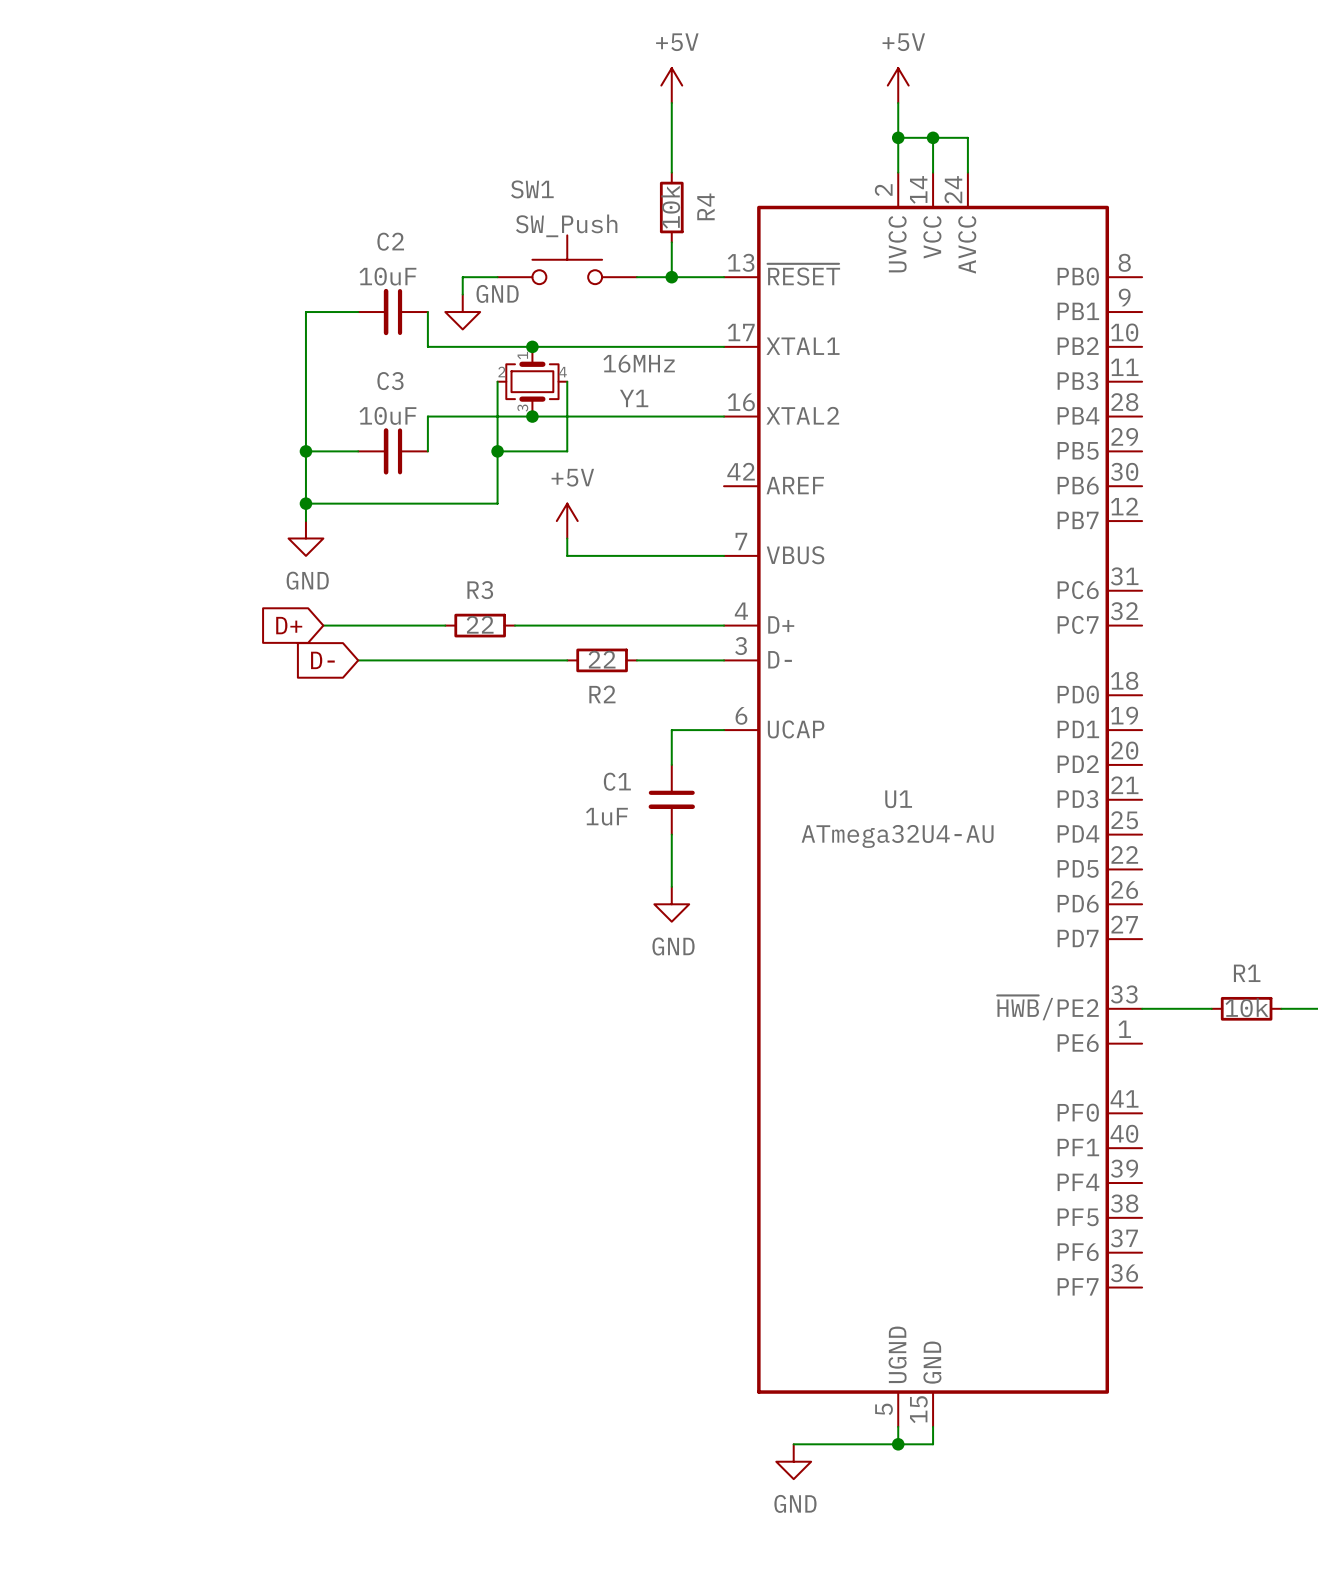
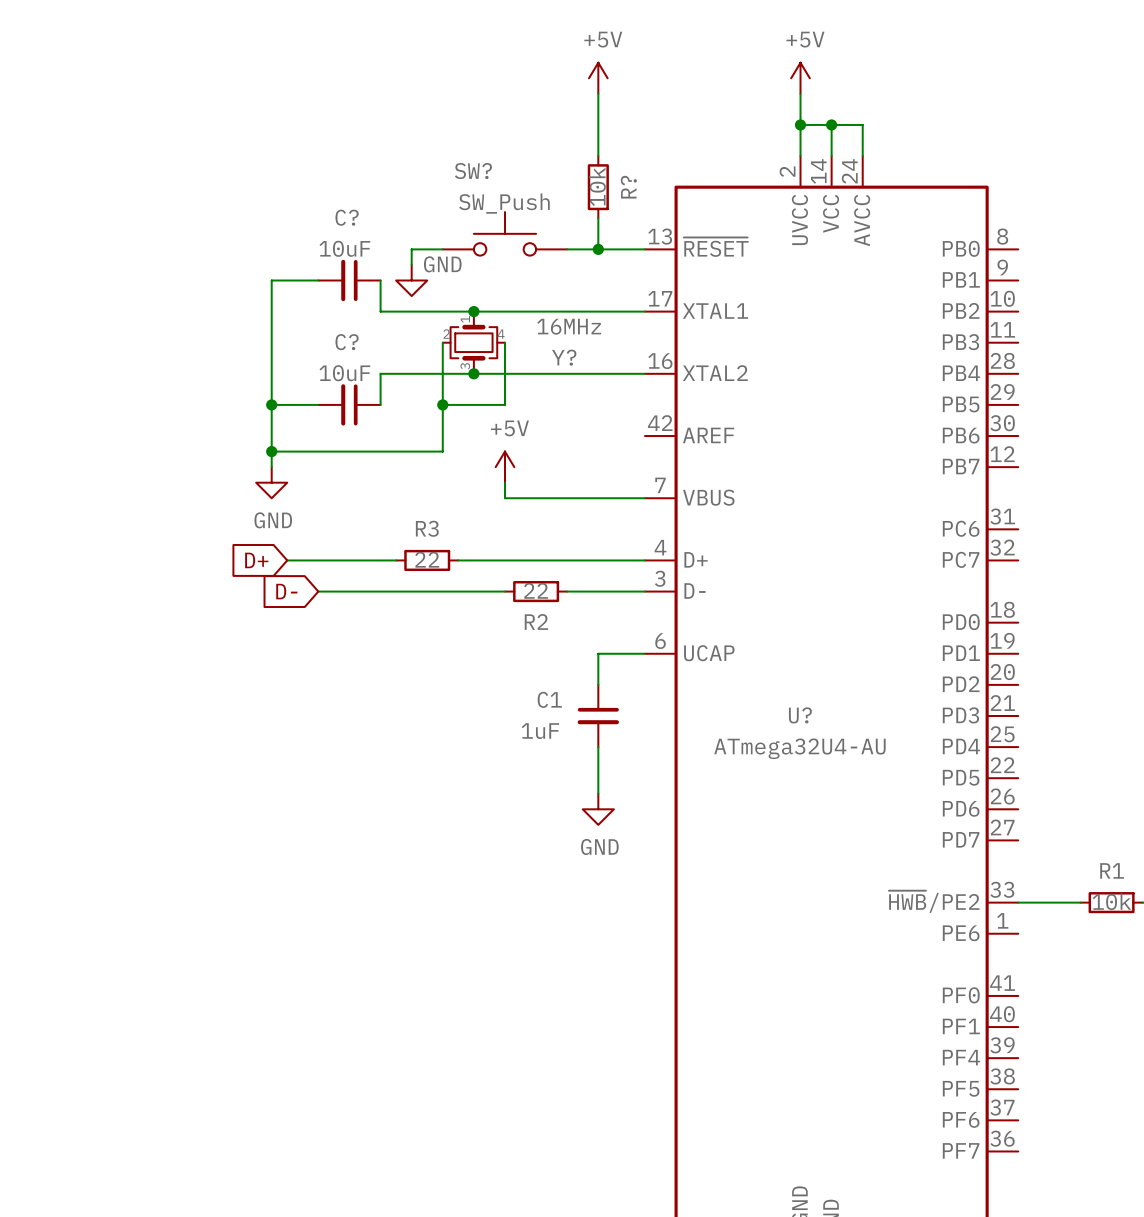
SW1 name: SW1 (532, 189) -> SW? (473, 171)
R4 name: R4 (705, 206) -> R? (628, 187)
C2 name: C2 (390, 241) -> C? (347, 217)
C3 name: C3 (390, 381) -> C? (347, 342)
Y1 name: Y1 (634, 398) -> Y? (564, 357)
U1 name: U1 (898, 799) -> U? (800, 715)

